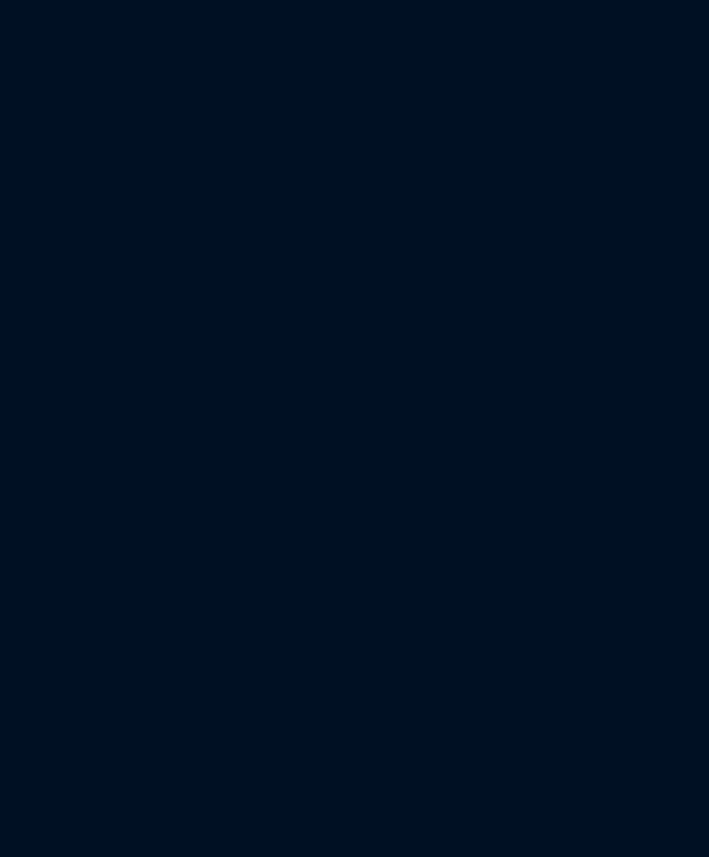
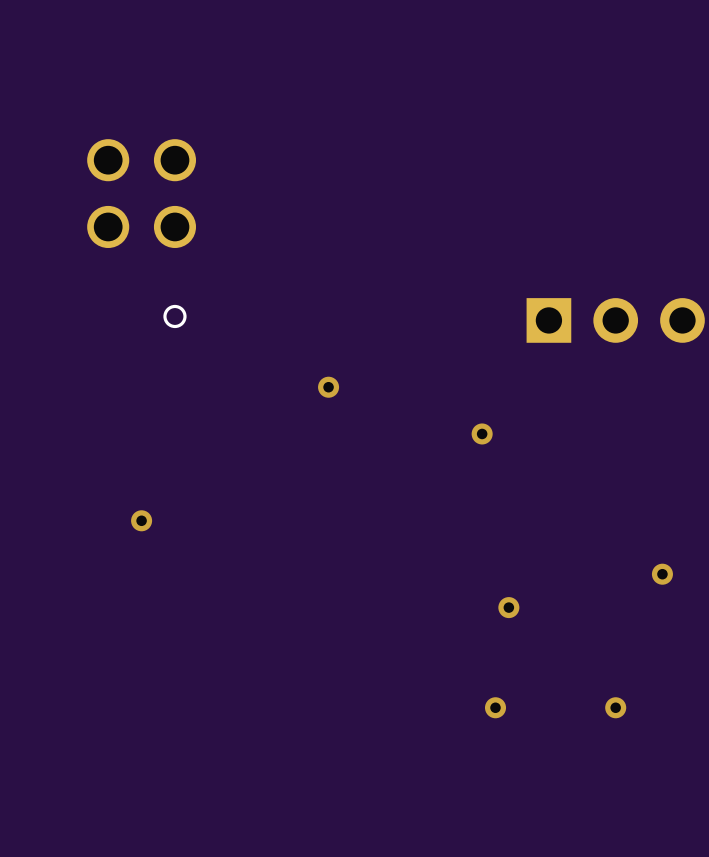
part: none -> (141, 233)
part: none -> (615, 320)
via: none -> (328, 387)
via: none -> (482, 433)
via: none -> (141, 520)
via: none -> (662, 574)
via: none -> (508, 607)
via: none -> (495, 707)
via: none -> (615, 707)

